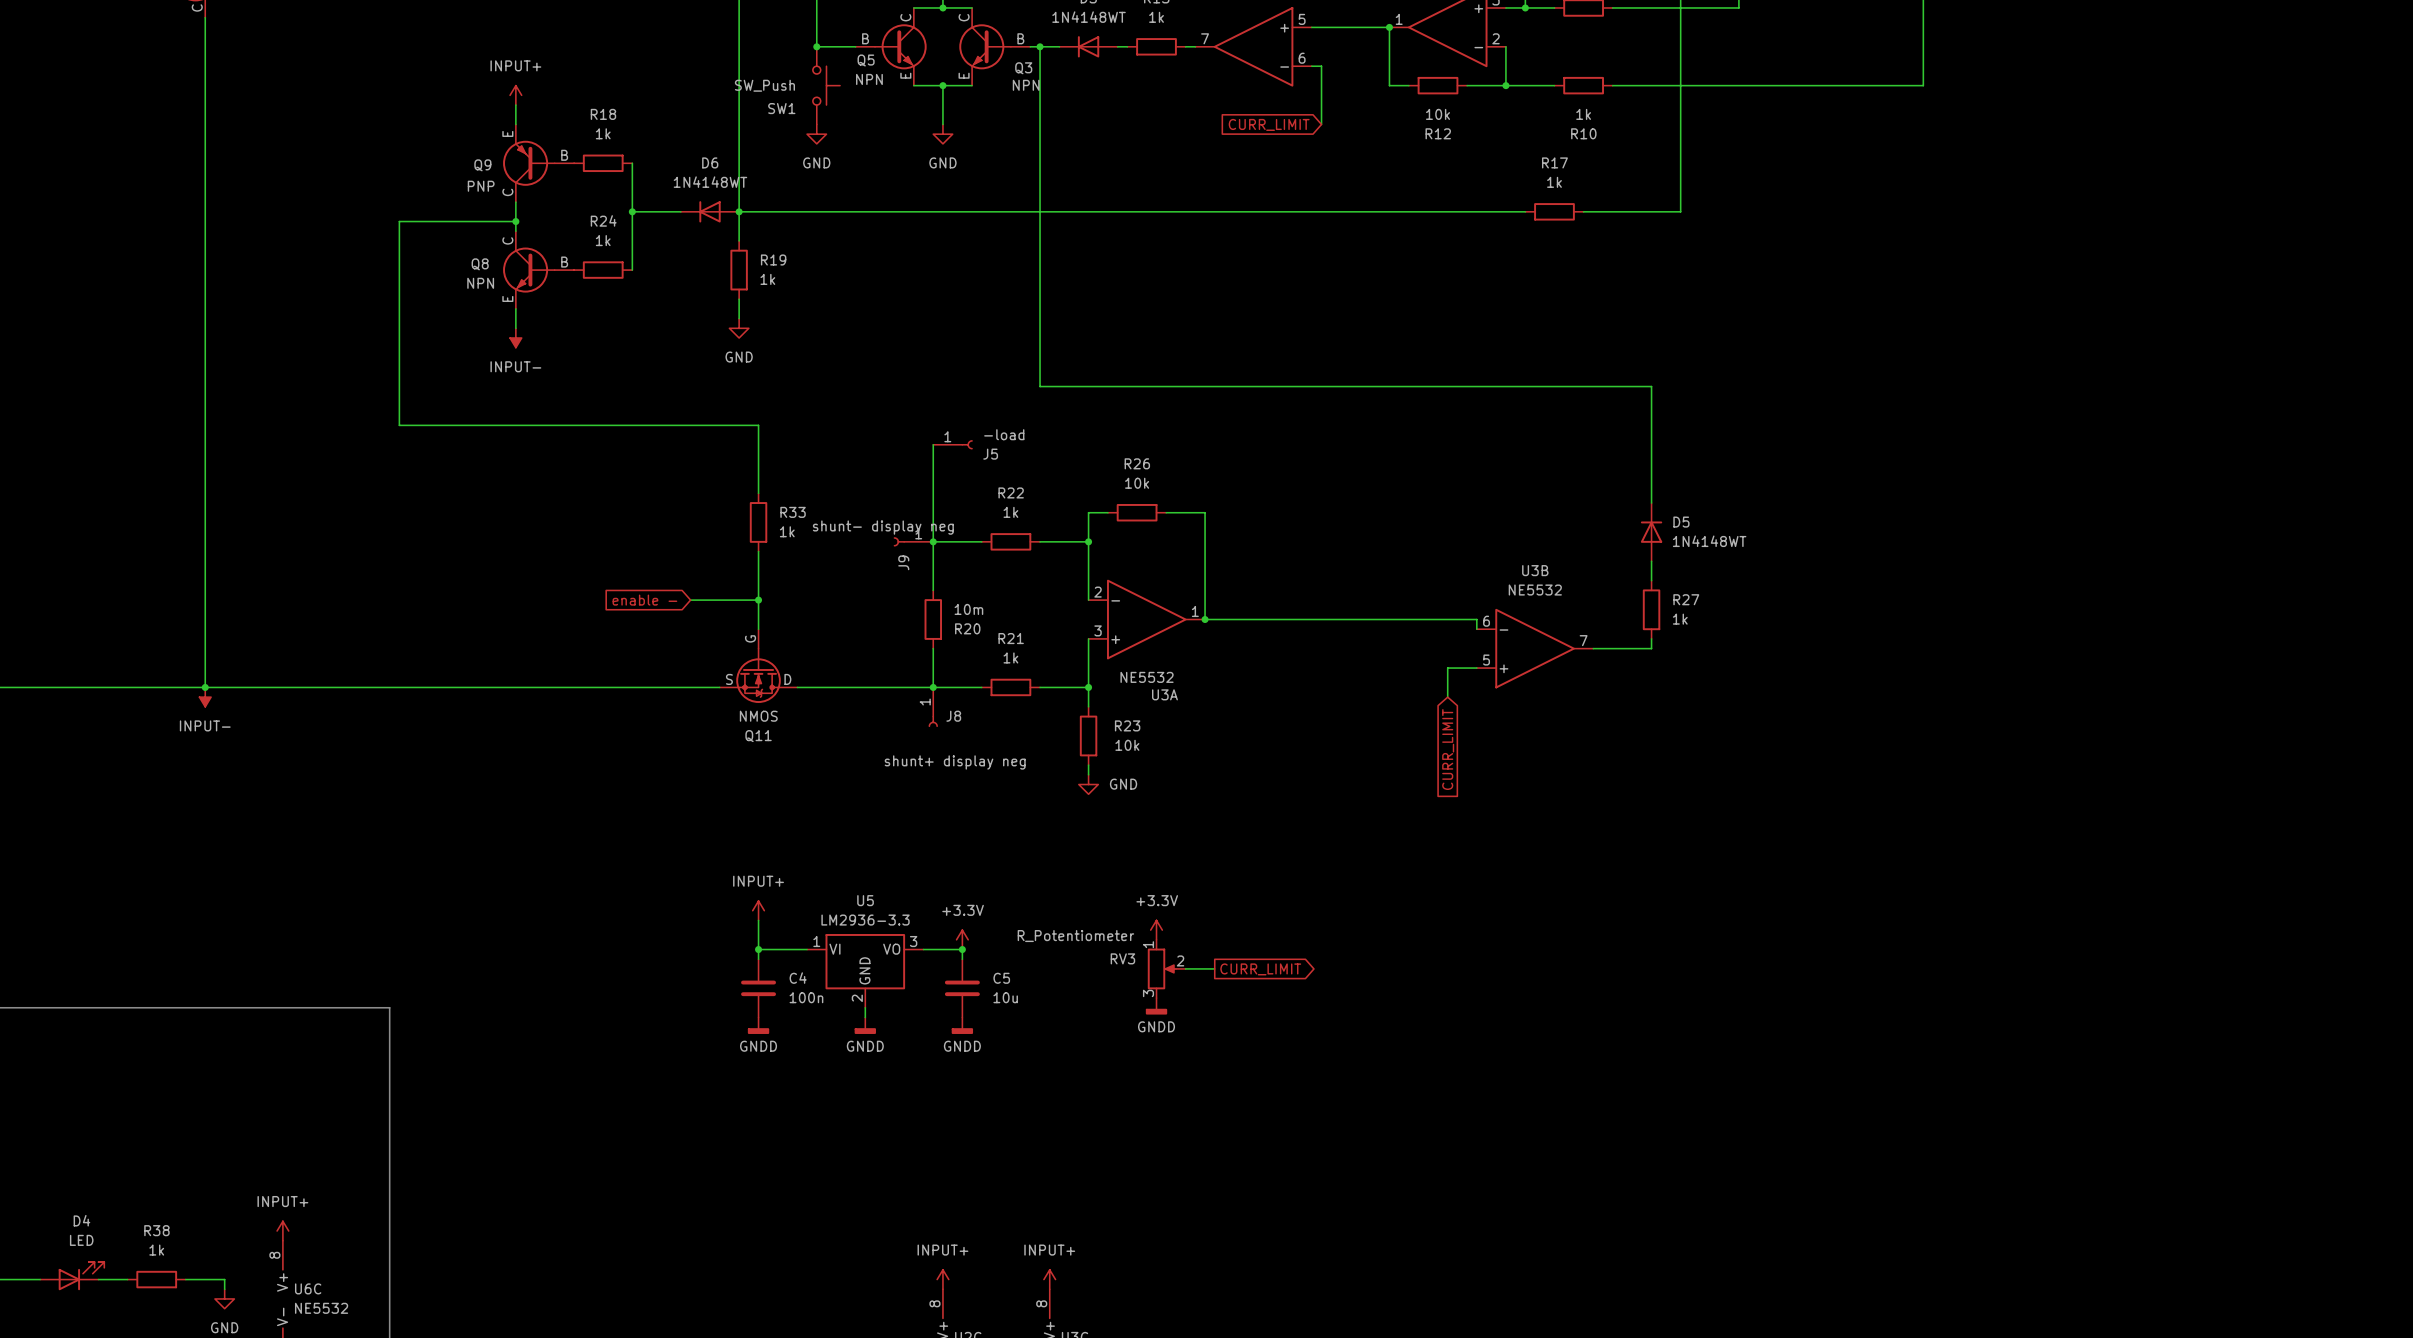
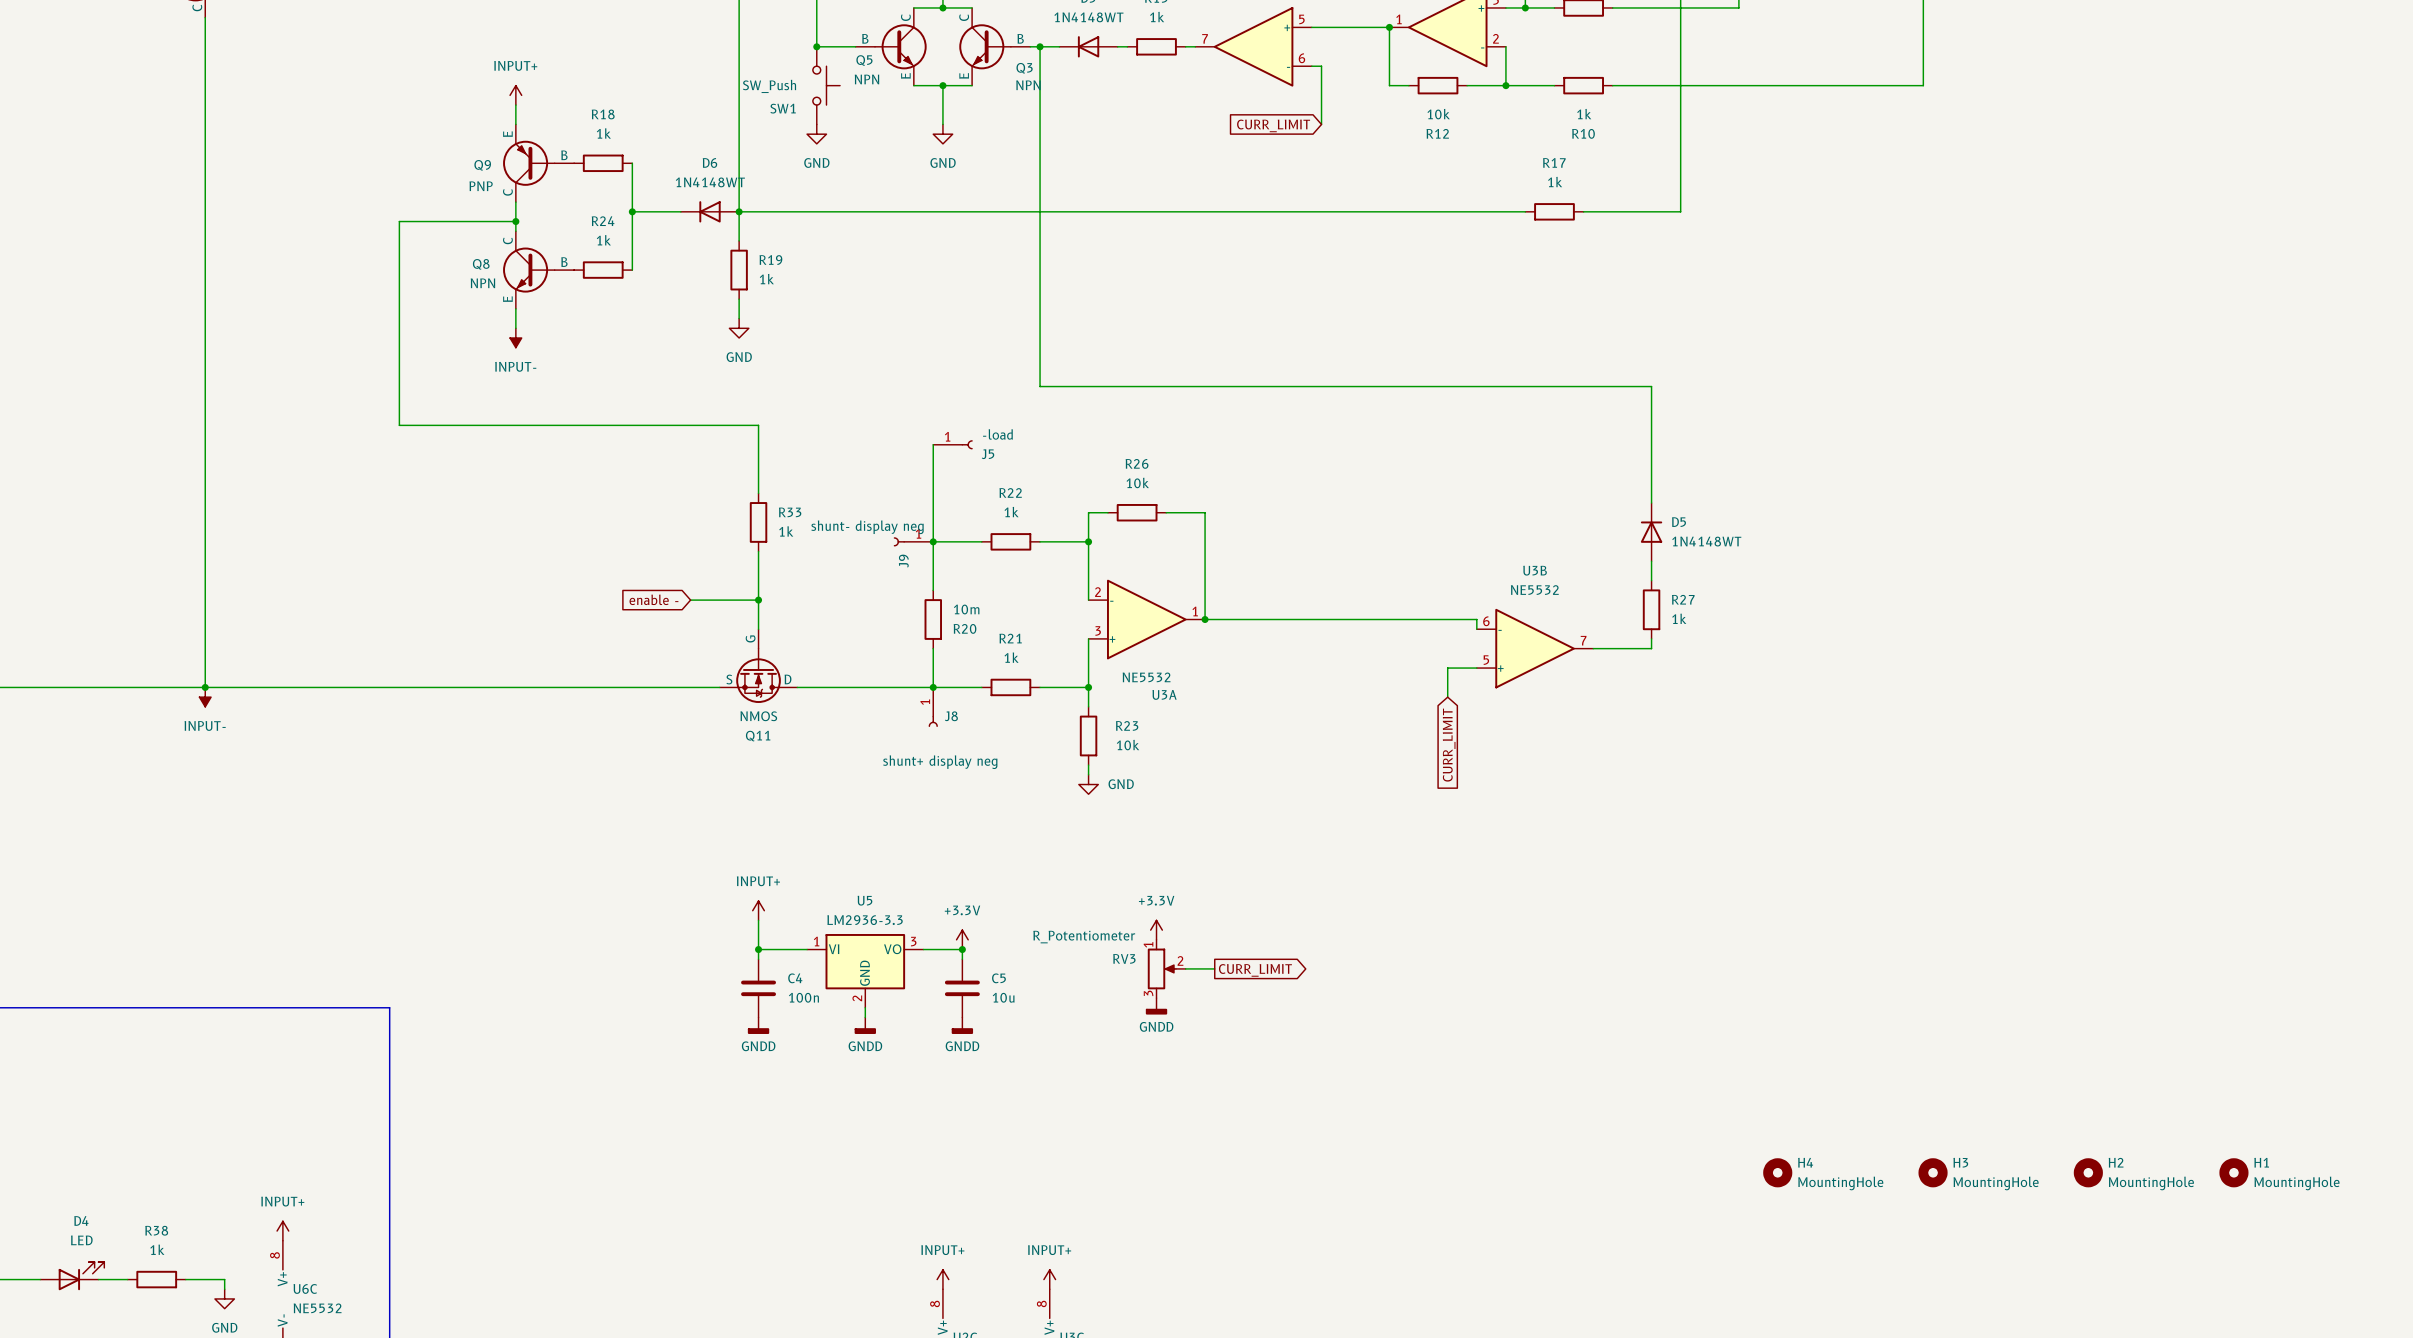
H4: none -> MountingHole (1777, 1172)
H3: none -> MountingHole (1933, 1172)
H2: none -> MountingHole (2088, 1172)
H1: none -> MountingHole (2233, 1172)

